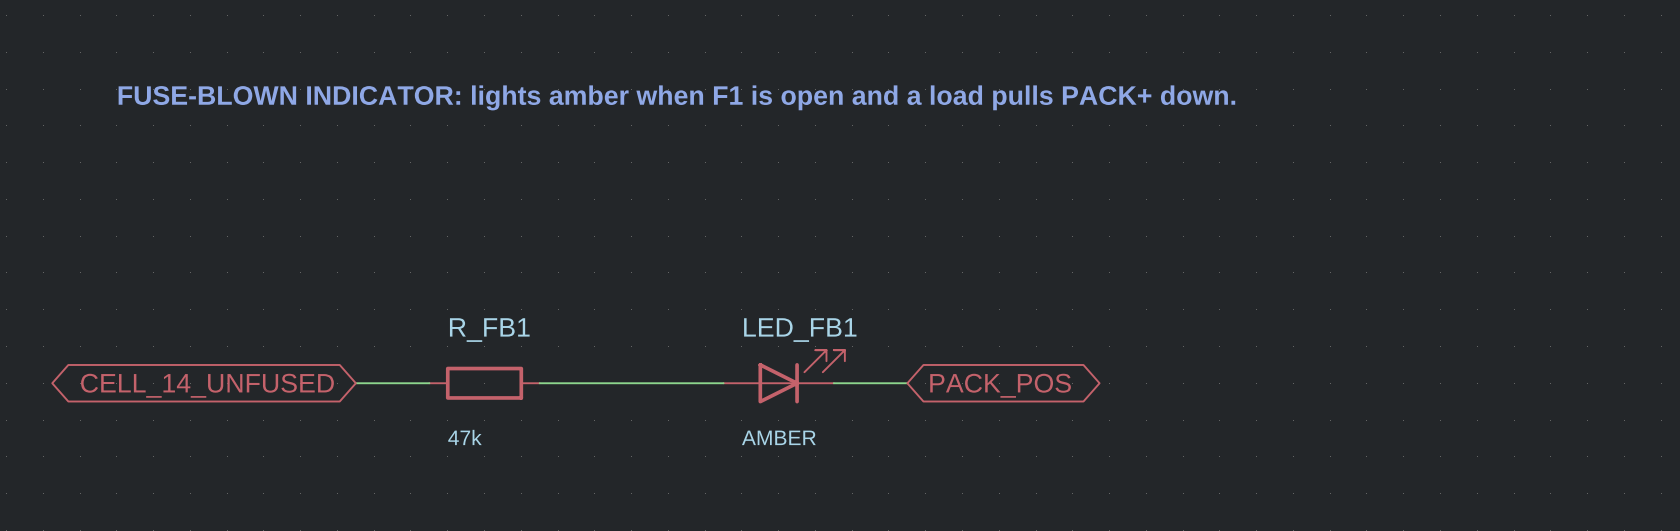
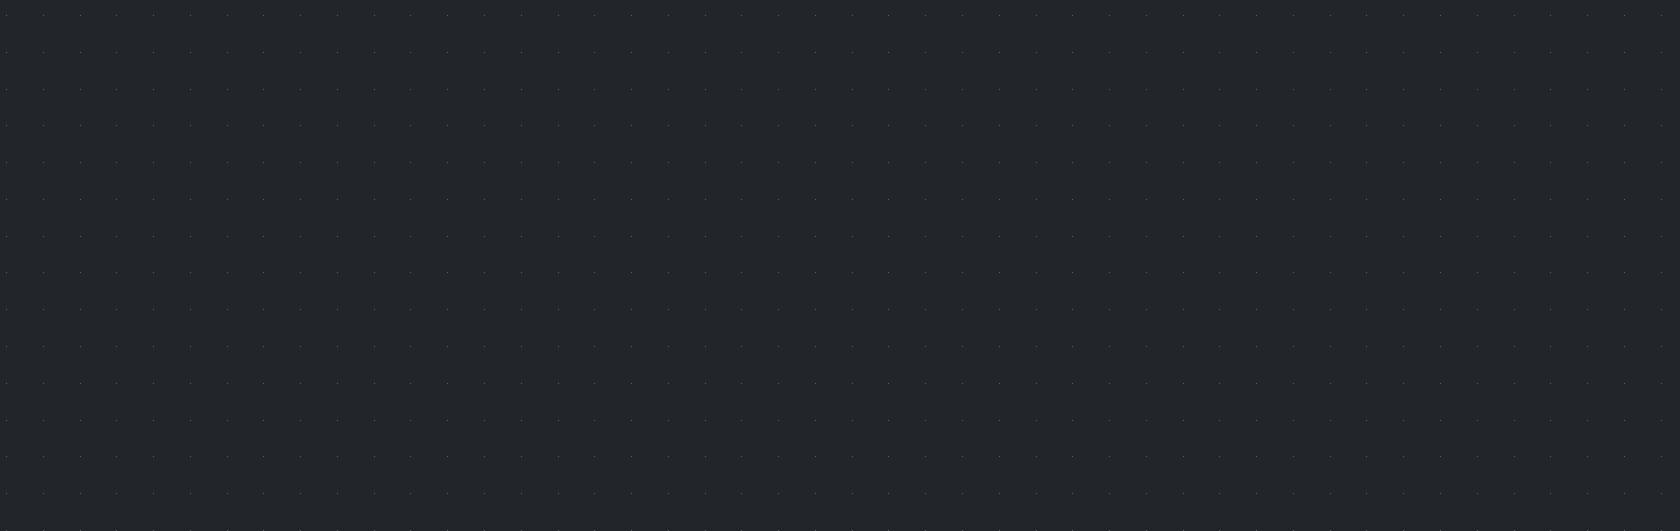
text: FUSE-BLOWN INDICATOR: lights amber when F1 is open and a load pulls PACK+ down. (676, 97) -> none
LED_FB1: AMBER (784, 376) -> none
wire: (355, 383) (429, 383) -> none
R_FB1: 47k (484, 383) -> none
wire: (539, 383) (723, 383) -> none
wire: (833, 383) (907, 383) -> none
global label: CELL_14_UNFUSED (207, 385) -> none
global label: PACK_POS (1000, 385) -> none

